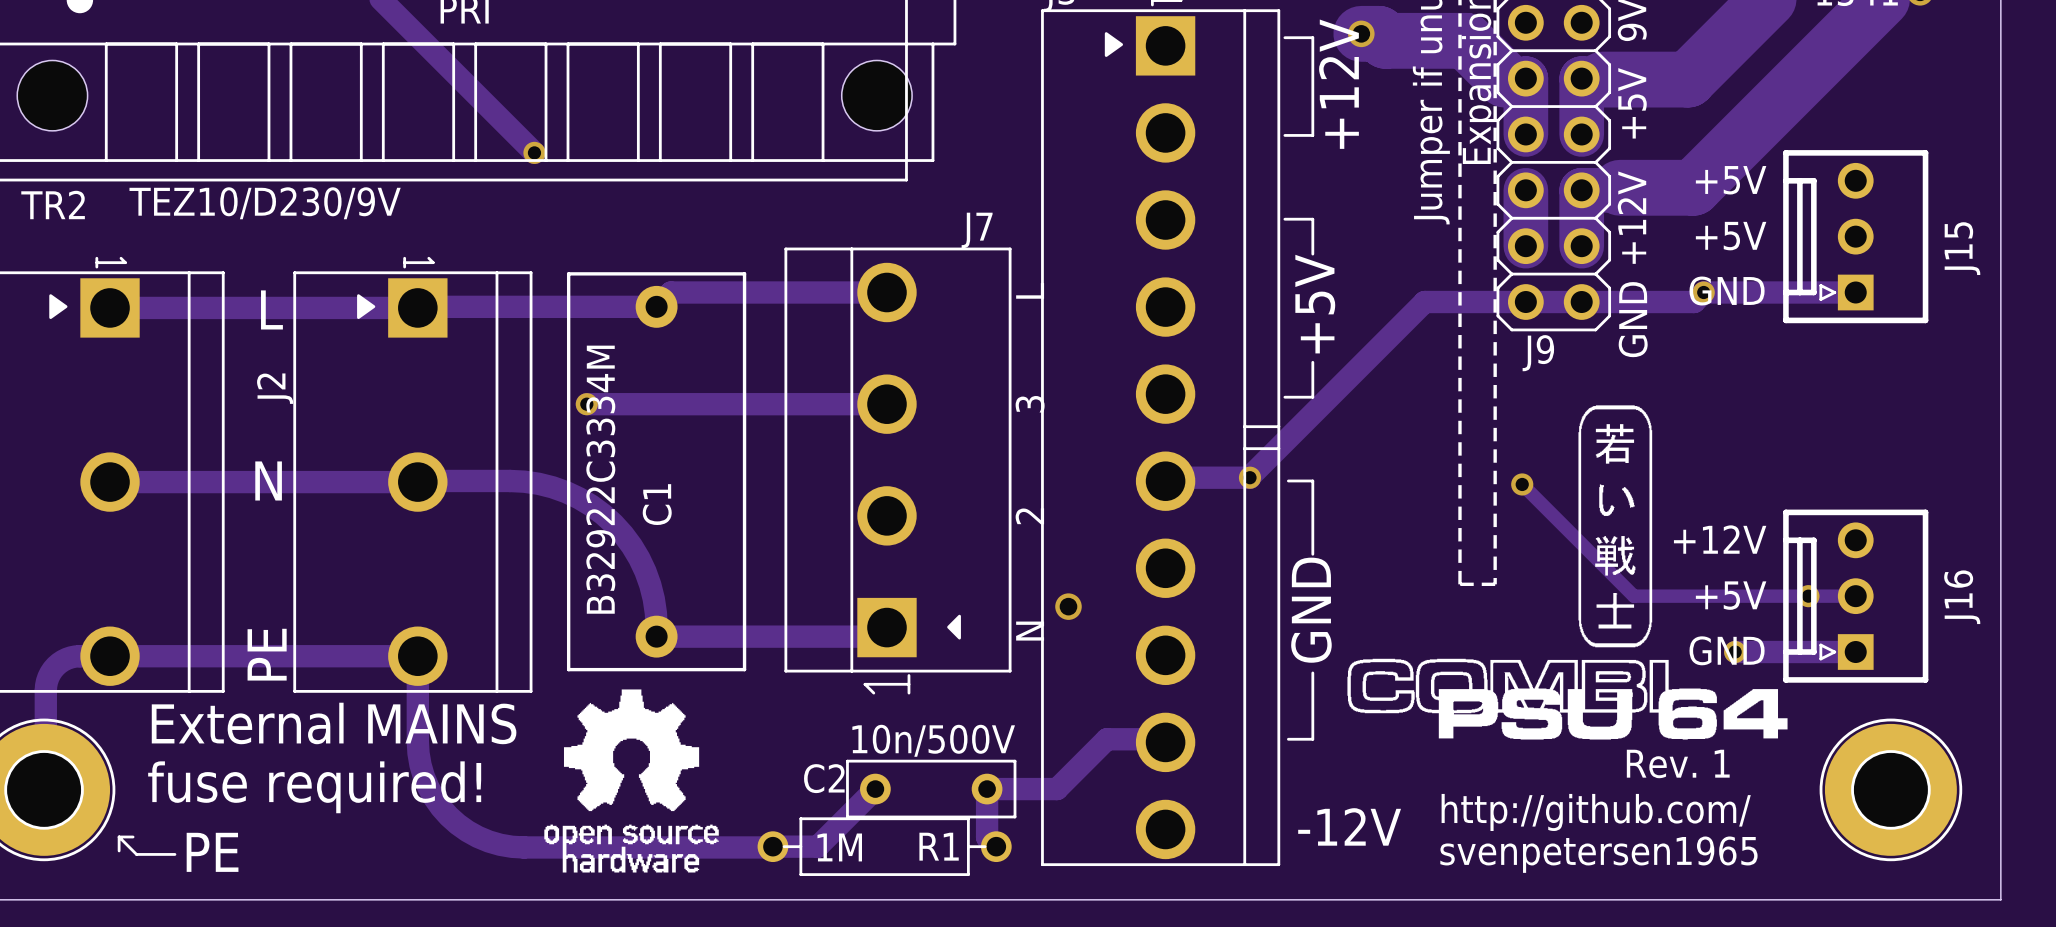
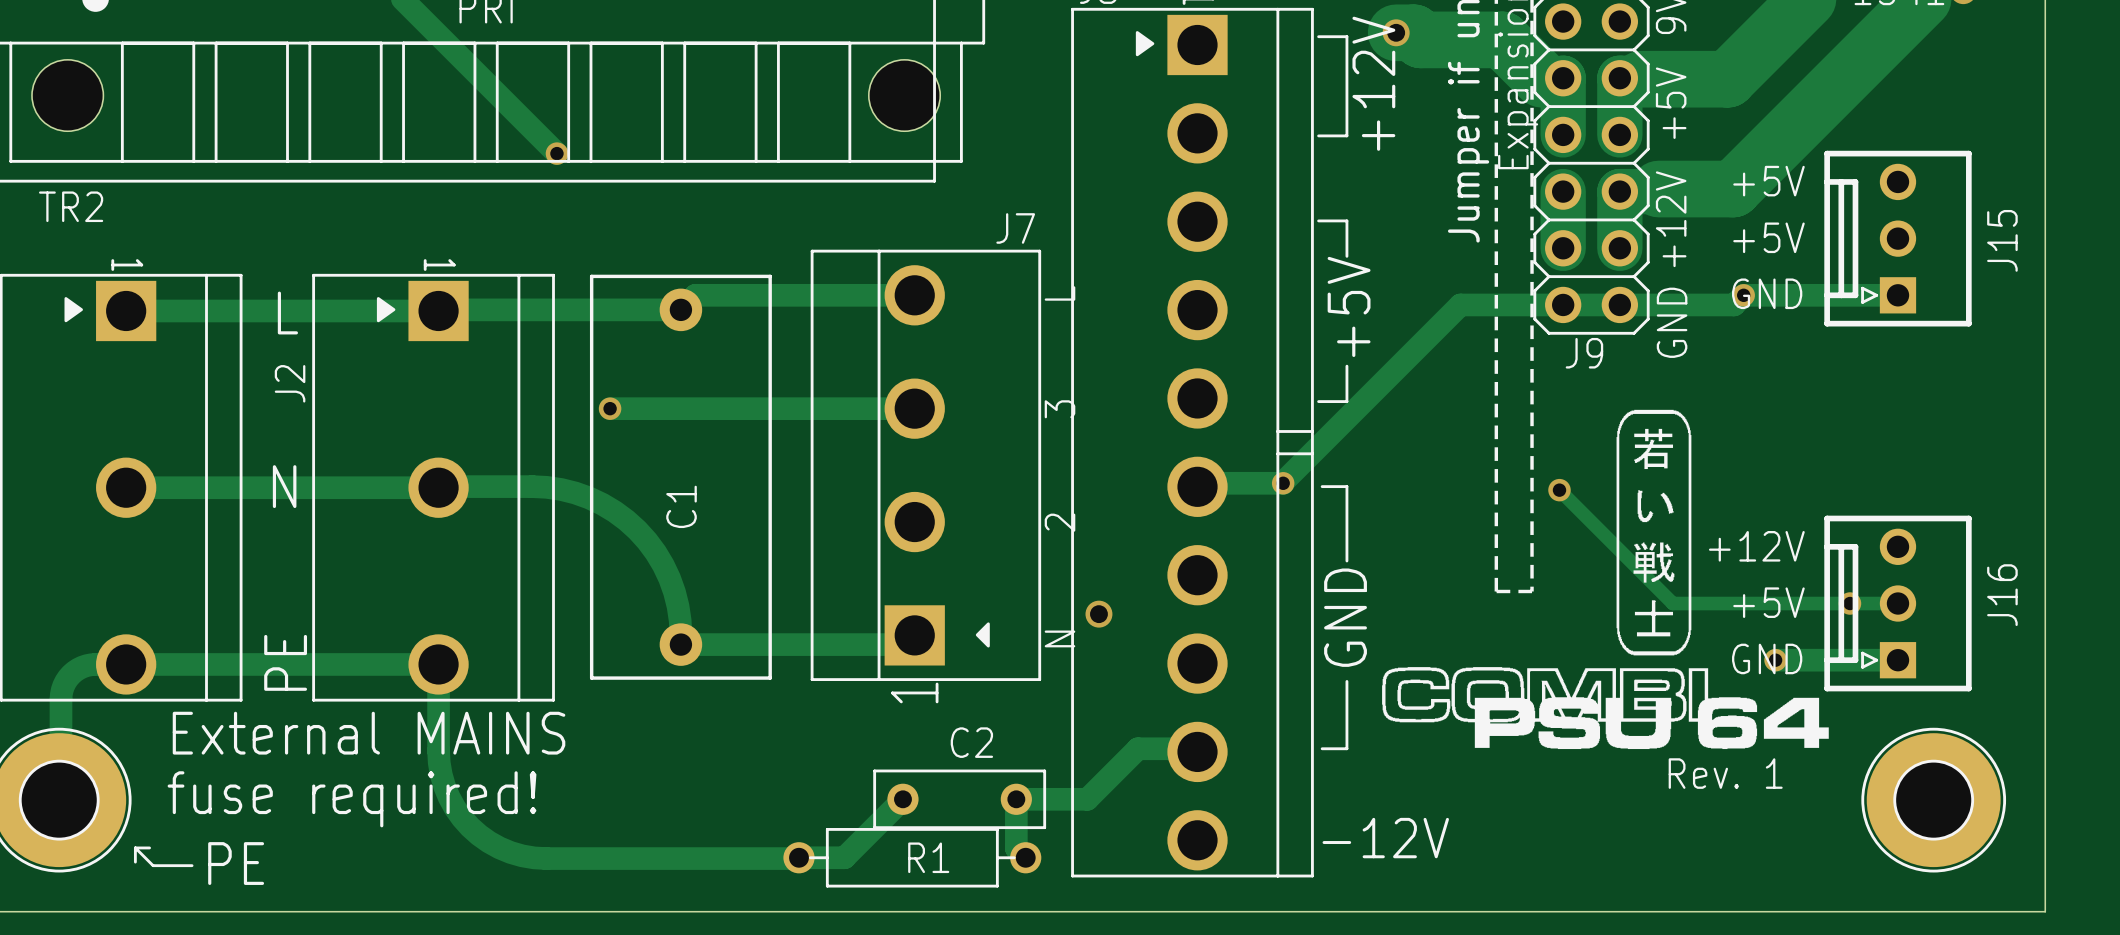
text: TEZ10/D230/9V (265, 203) -> none
text: B32922C3334M (600, 479) -> none
drawing: [544, 689, 719, 873] -> none
text: 10n/500V (933, 740) -> none
C2 name position: C2 (824, 778) -> C2 (971, 742)
text: http://github.com/ (1596, 812) -> none
R1 name position: R1 (939, 846) -> R1 (928, 857)
text: 1M (839, 847) -> none
text: svenpetersen1965 (1598, 854) -> none

